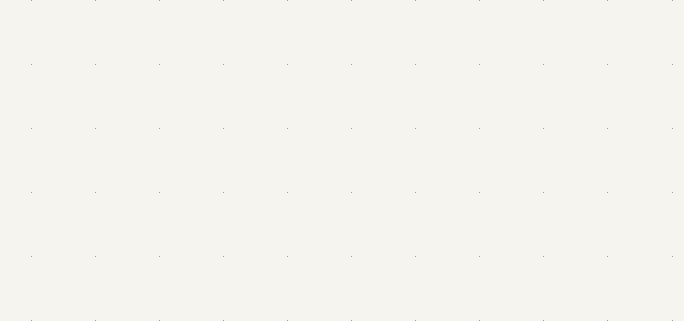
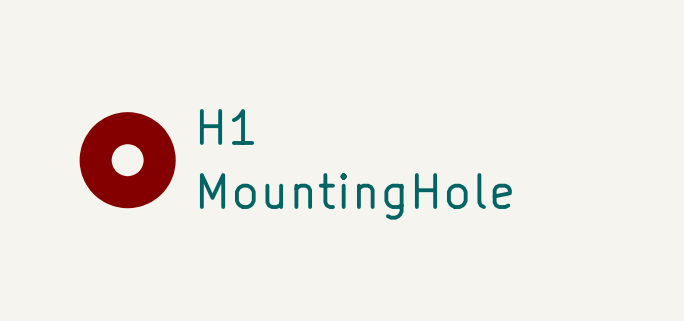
H1: none -> MountingHole (127, 160)

